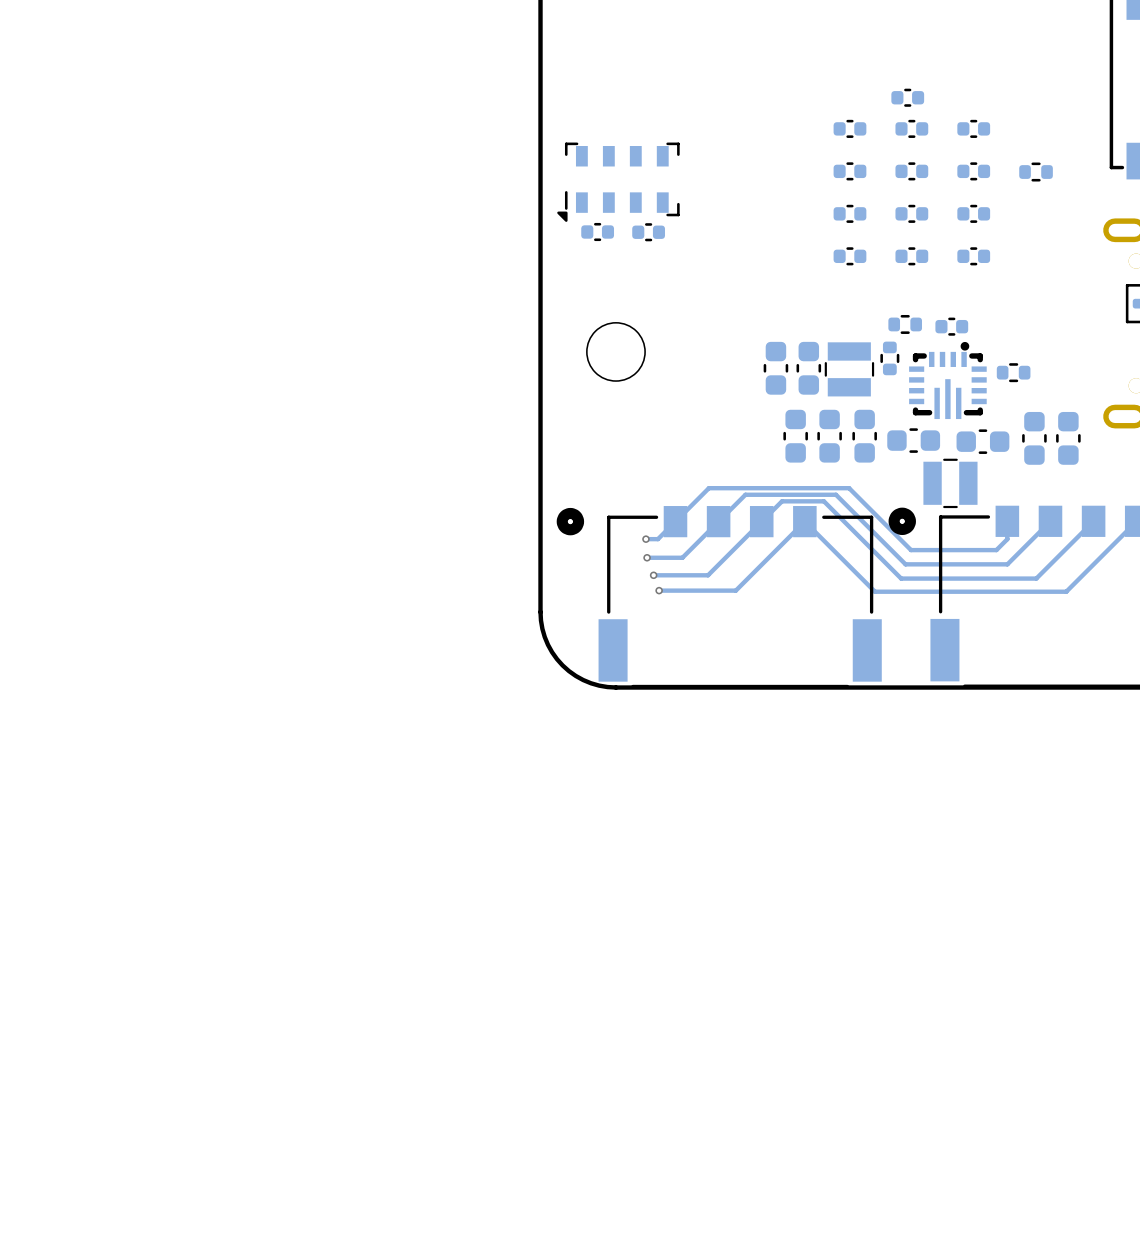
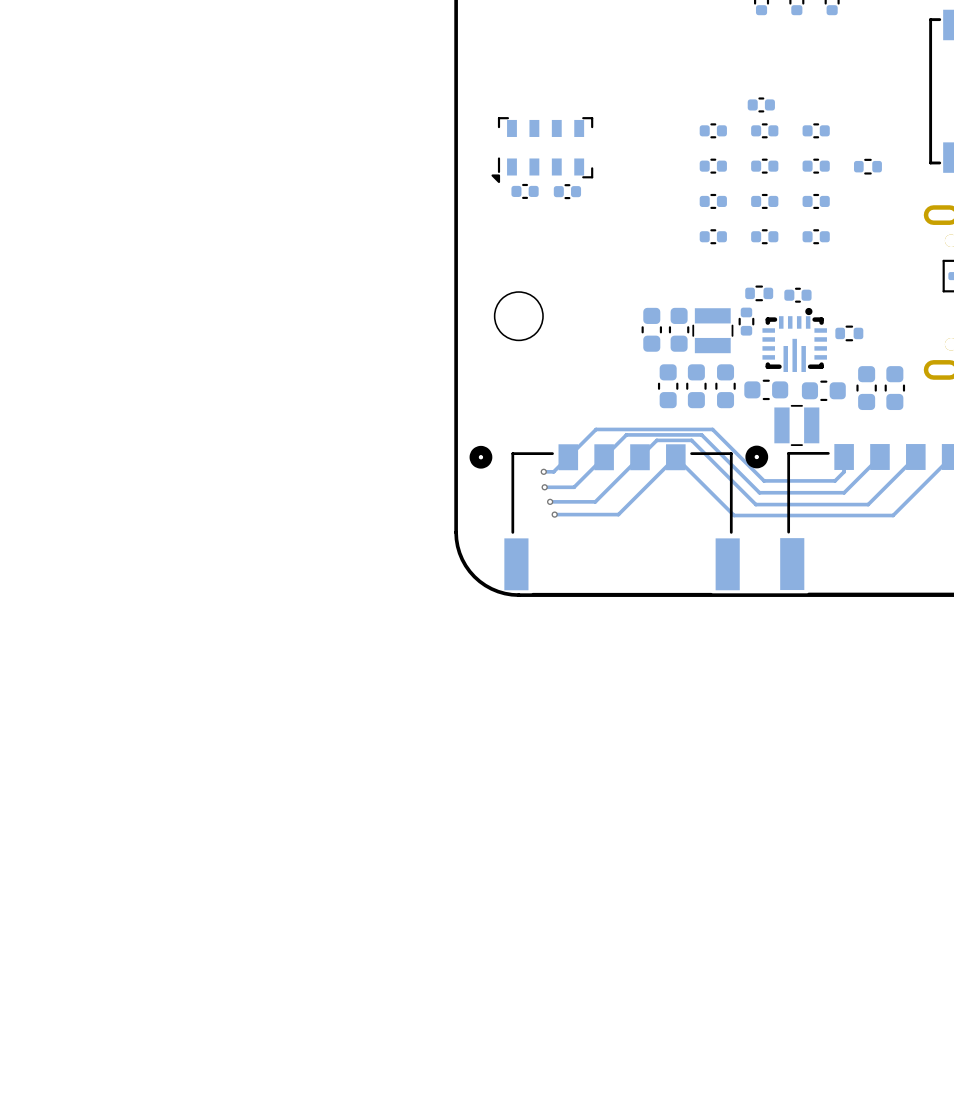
part position: (618, 182) -> (542, 150)
part: none -> (525, 191)
part: none -> (567, 191)
part: (597, 232) -> none
part: (648, 232) -> none

